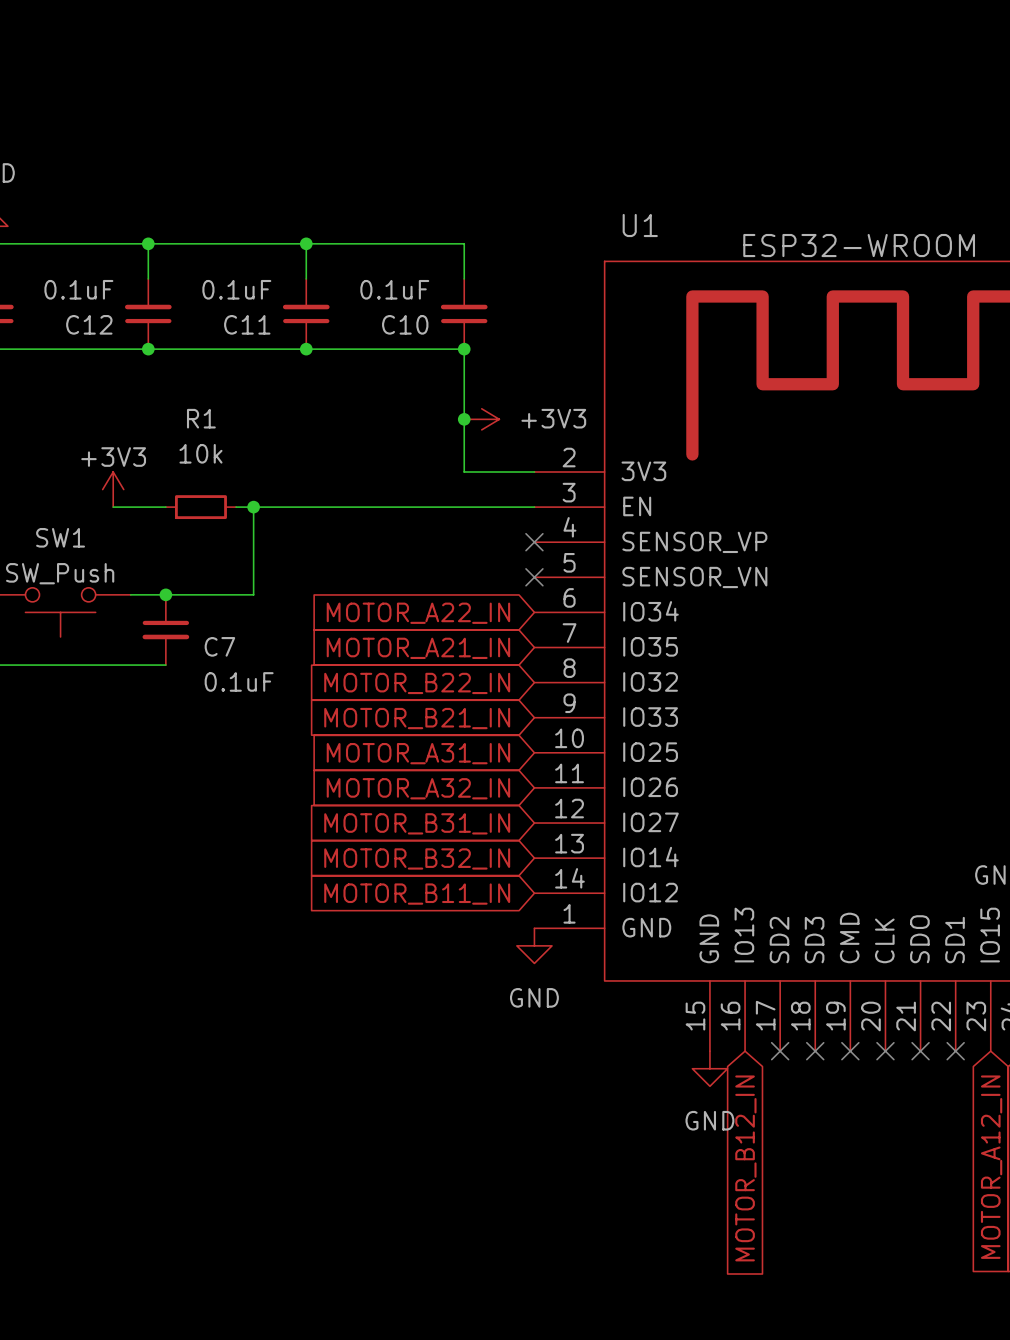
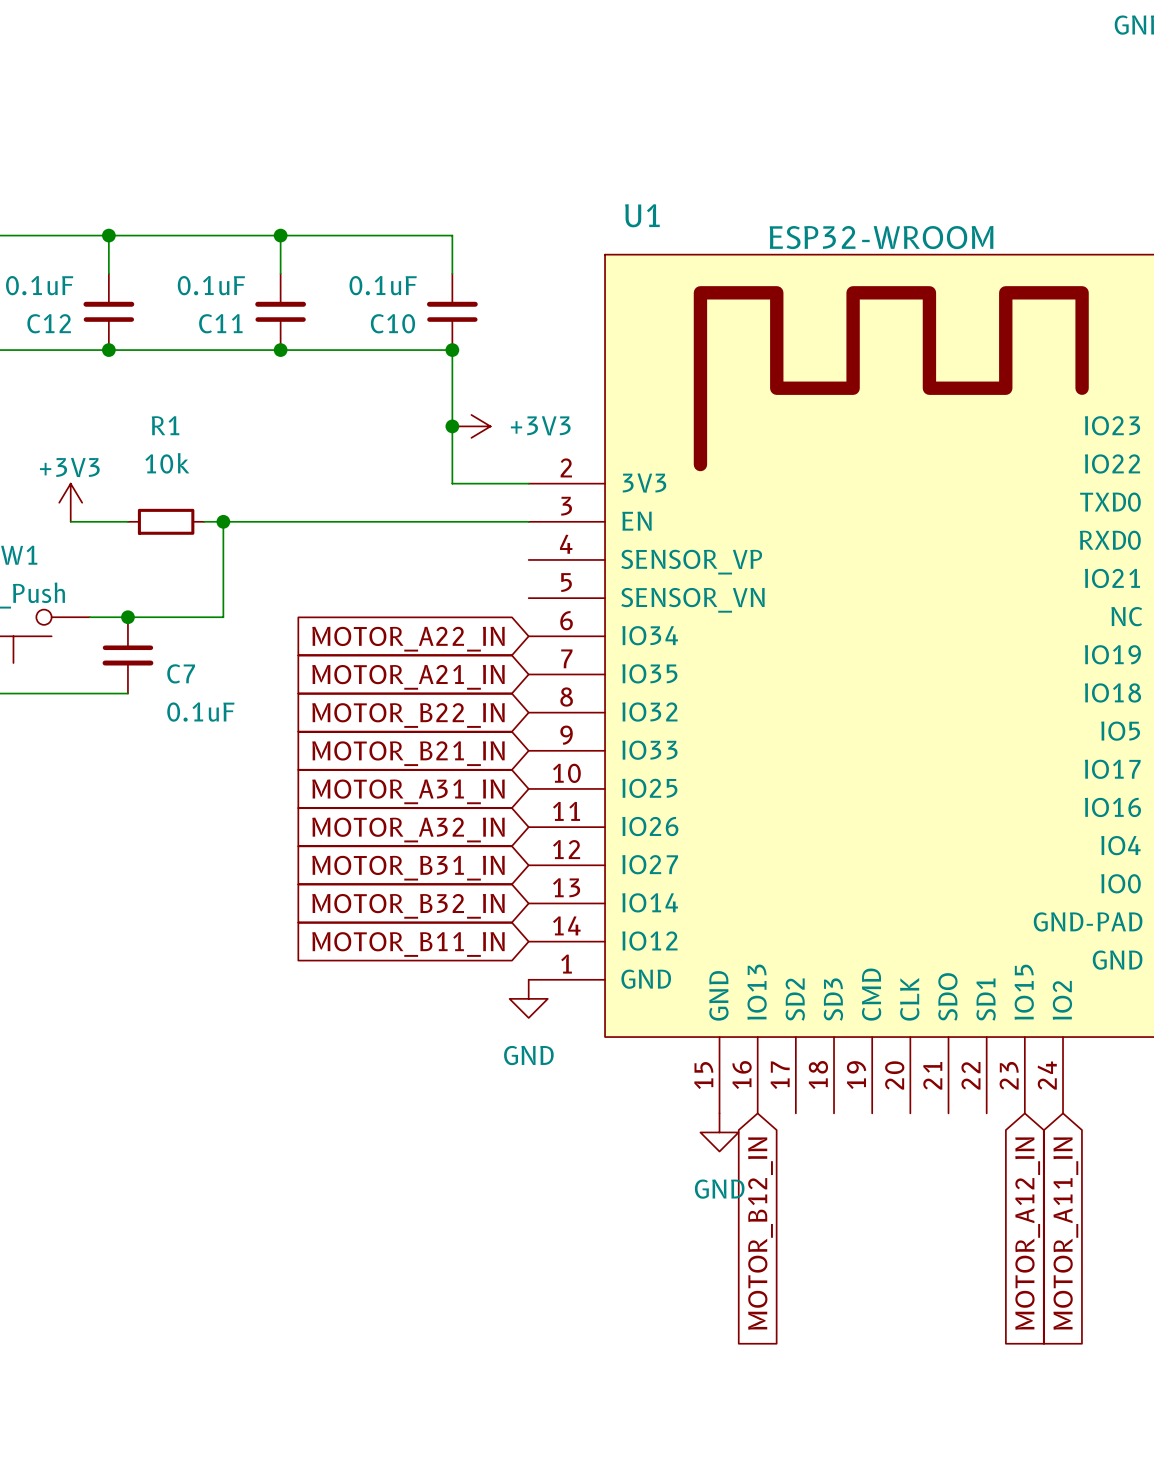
no-connect mark: (534, 542) -> none
no-connect mark: (534, 577) -> none
no-connect mark: (780, 1051) -> none
no-connect mark: (815, 1051) -> none
no-connect mark: (850, 1051) -> none
no-connect mark: (885, 1051) -> none
no-connect mark: (920, 1051) -> none
no-connect mark: (955, 1051) -> none

